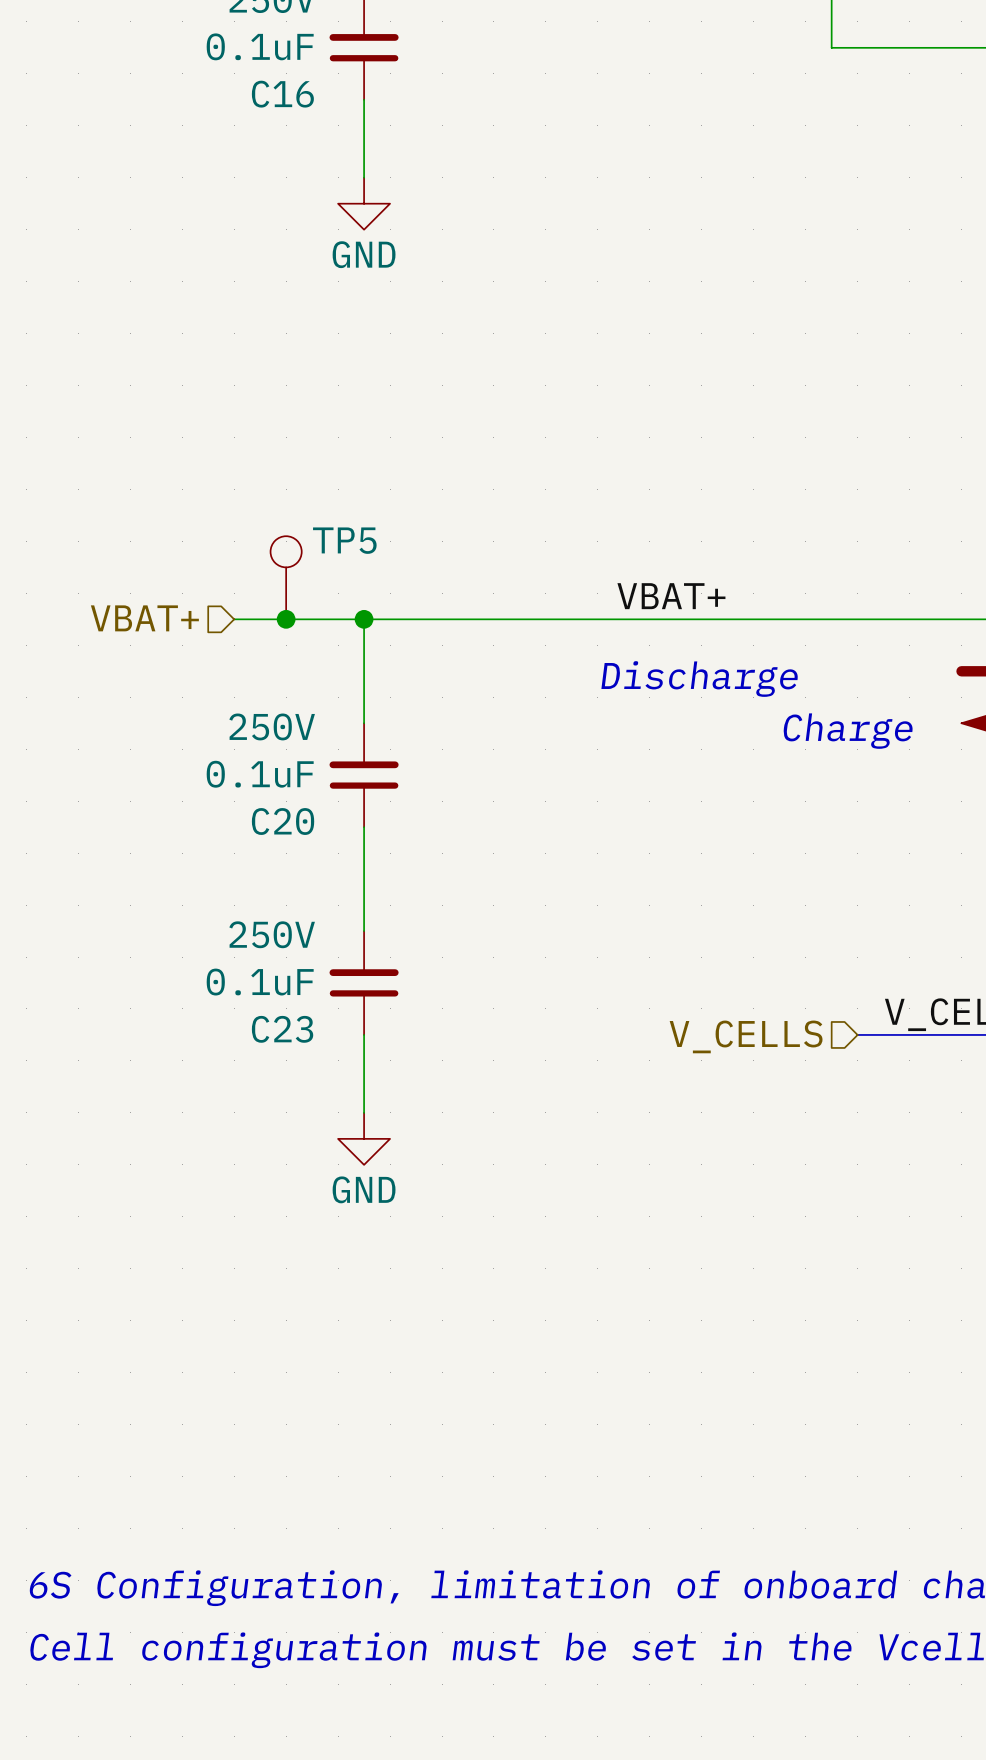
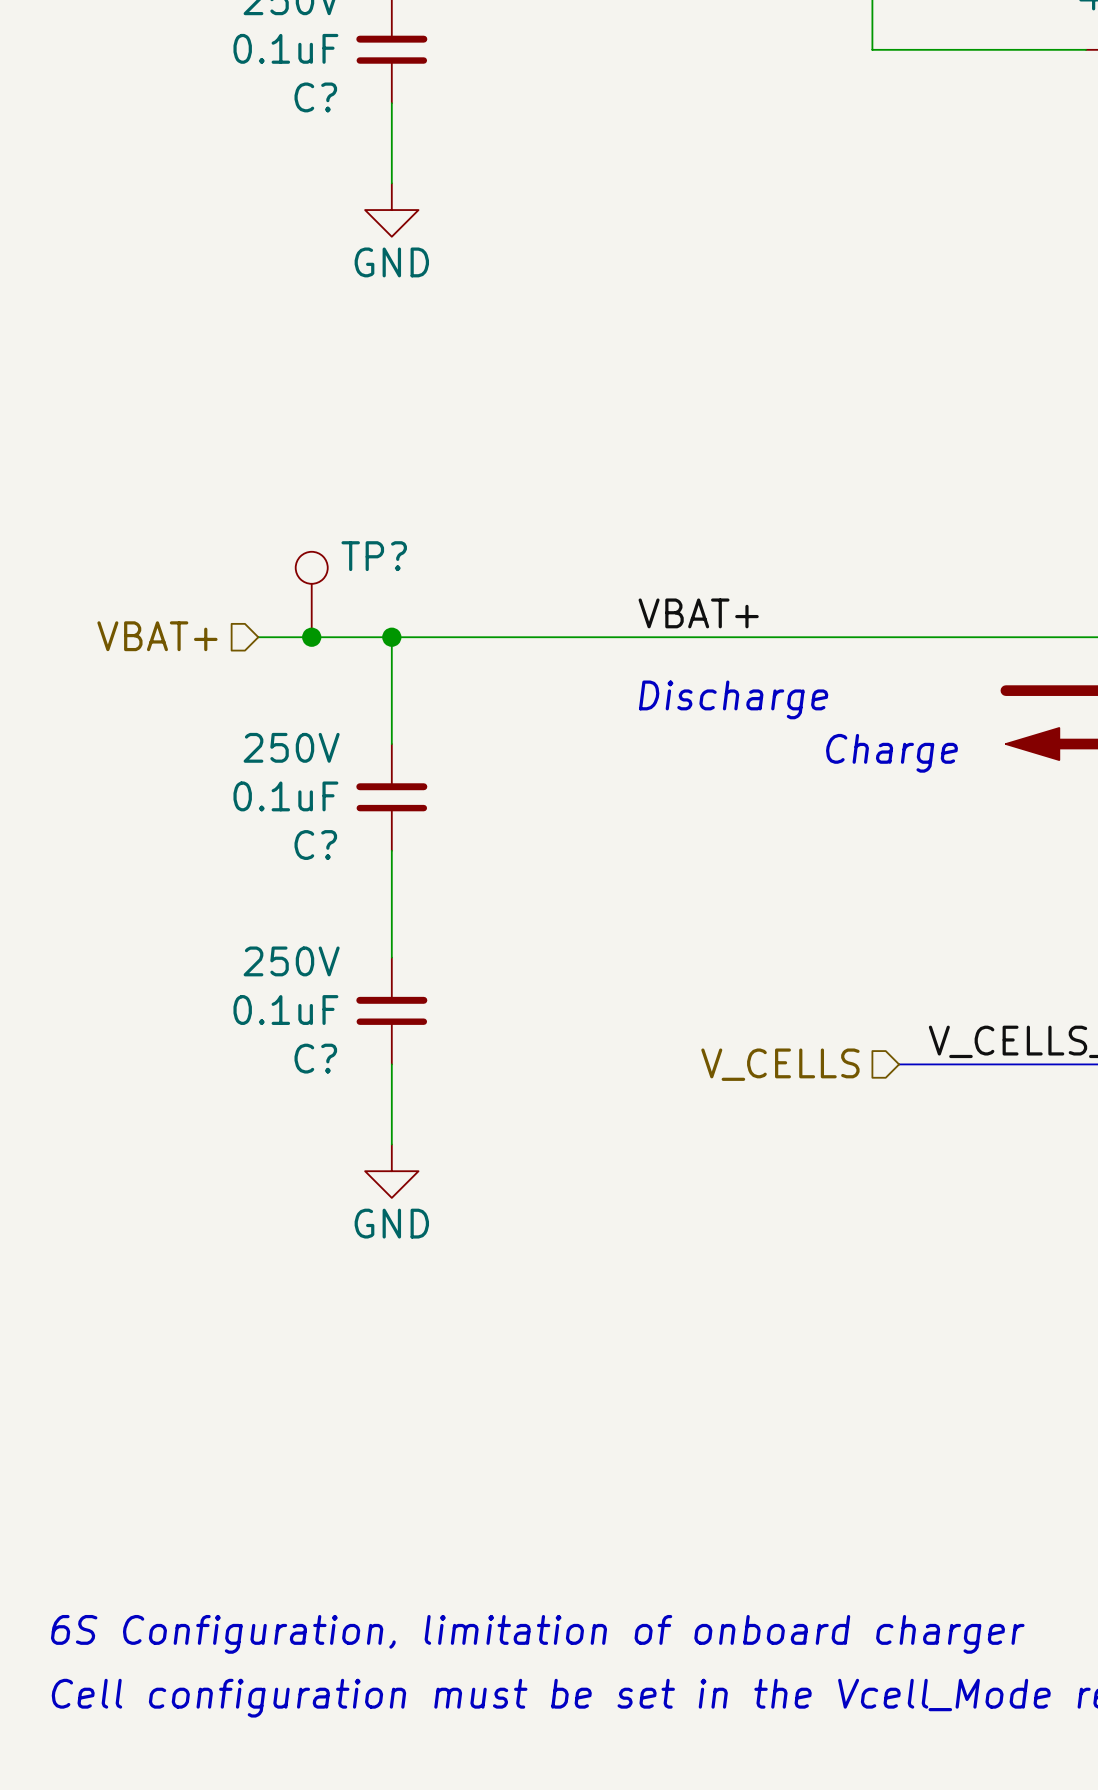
C16 name: C16 (282, 94) -> C? (315, 97)
TP5 name: TP5 (344, 540) -> TP? (374, 556)
C20 name: C20 (283, 821) -> C? (315, 845)
C23 name: C23 (282, 1029) -> C? (315, 1058)

